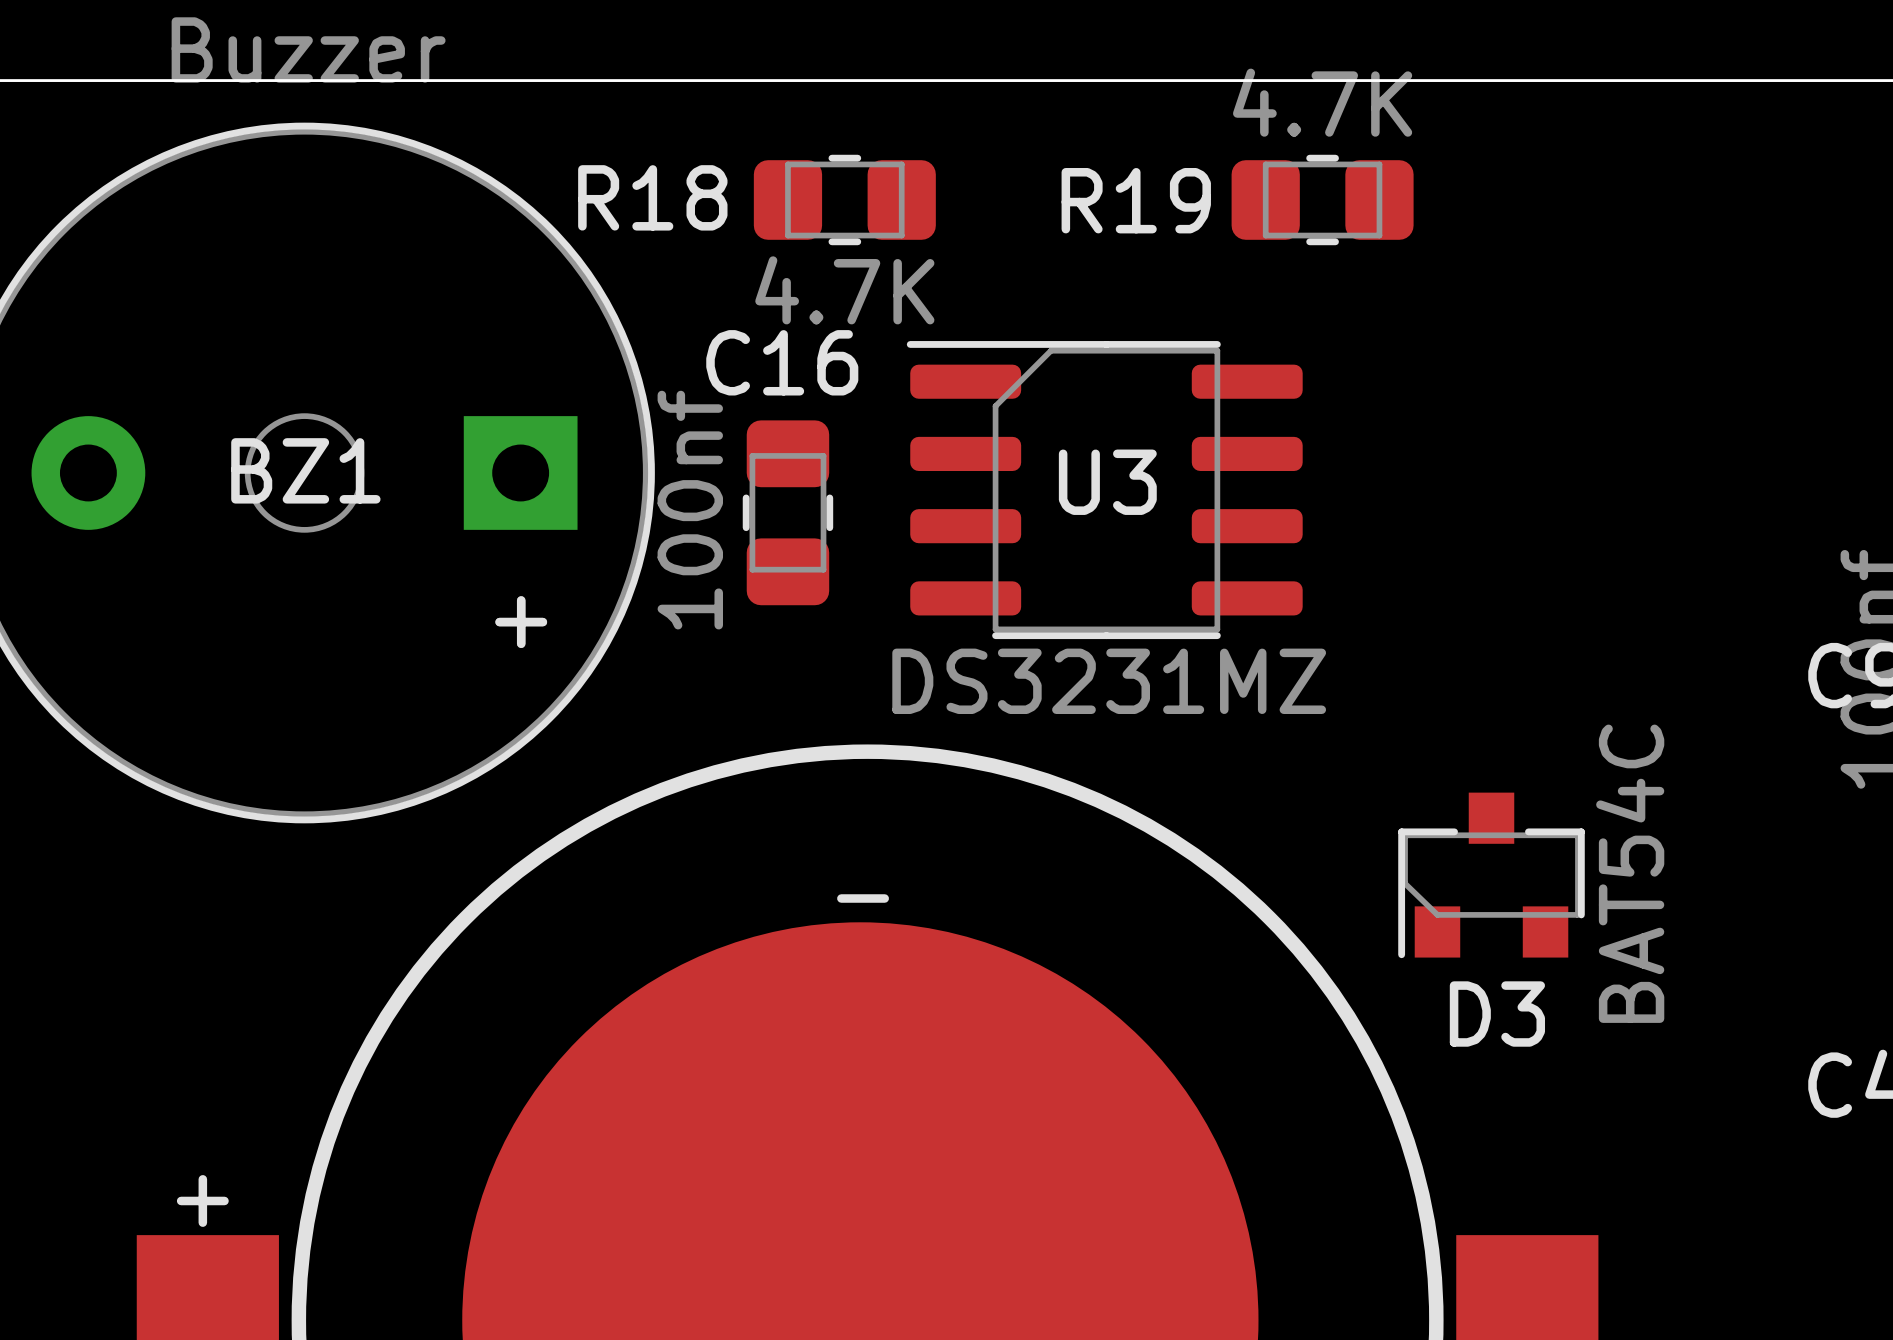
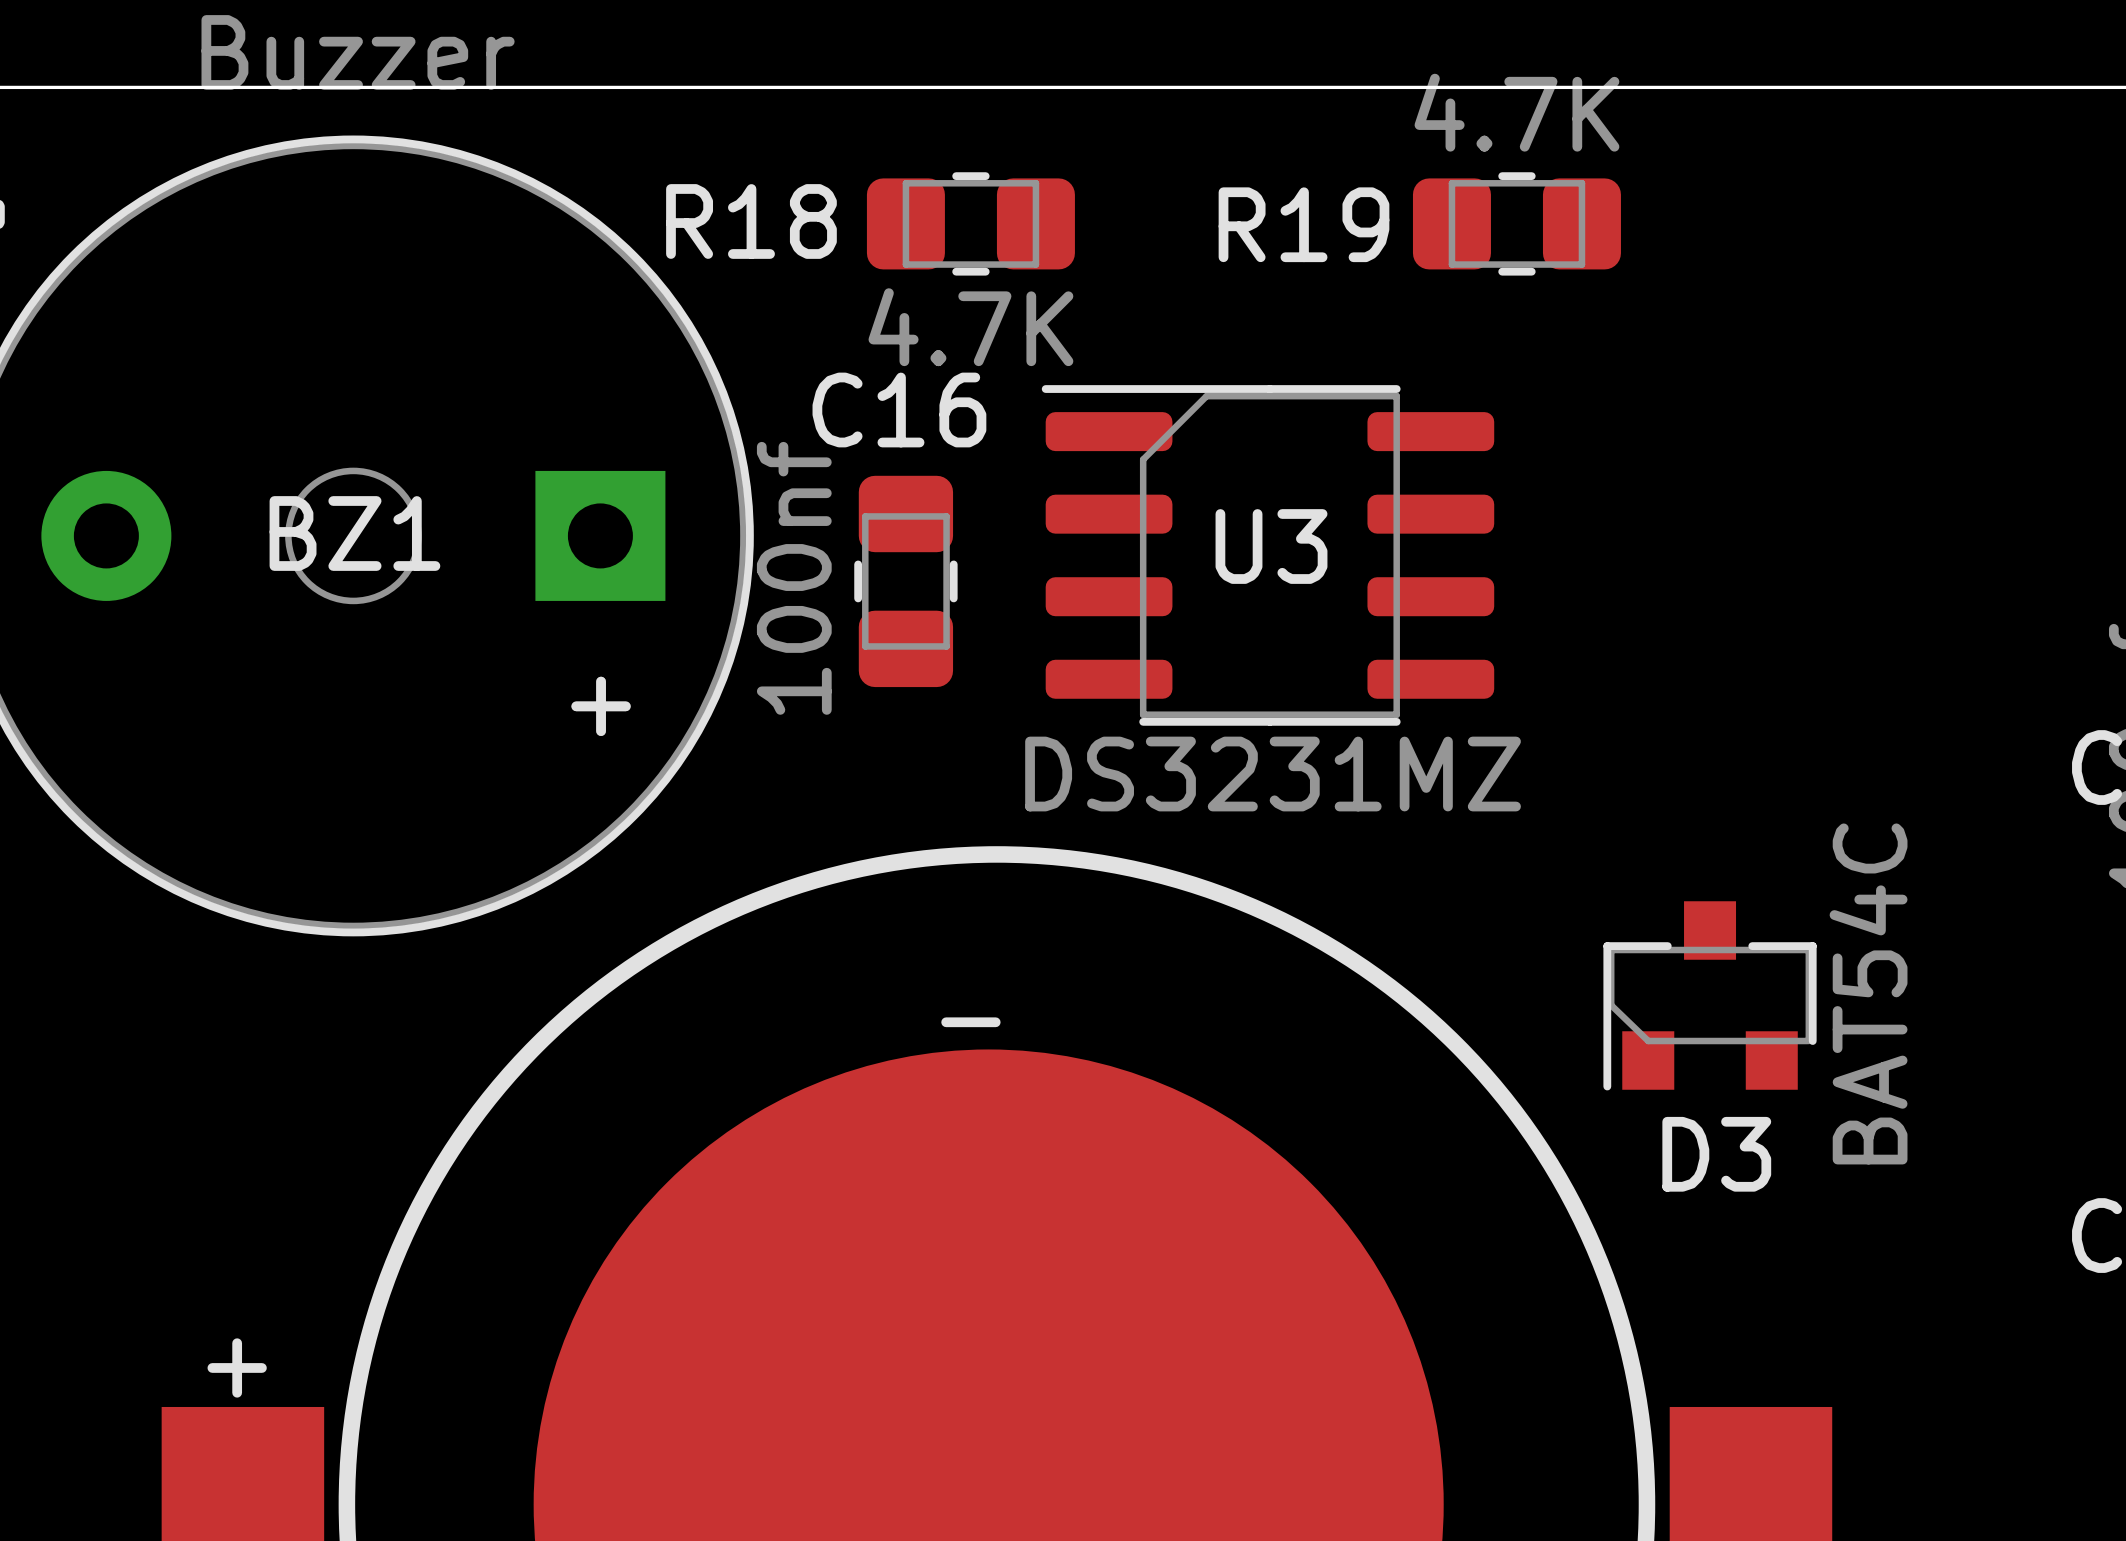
part text position: - (863, 898) -> - (970, 1022)

